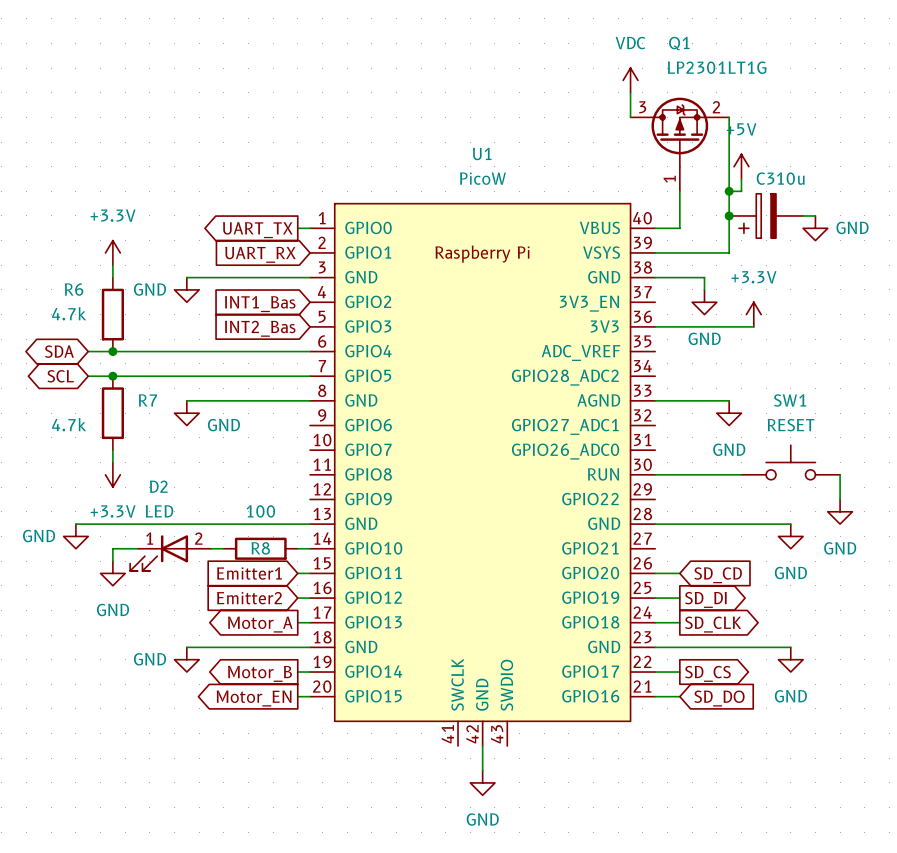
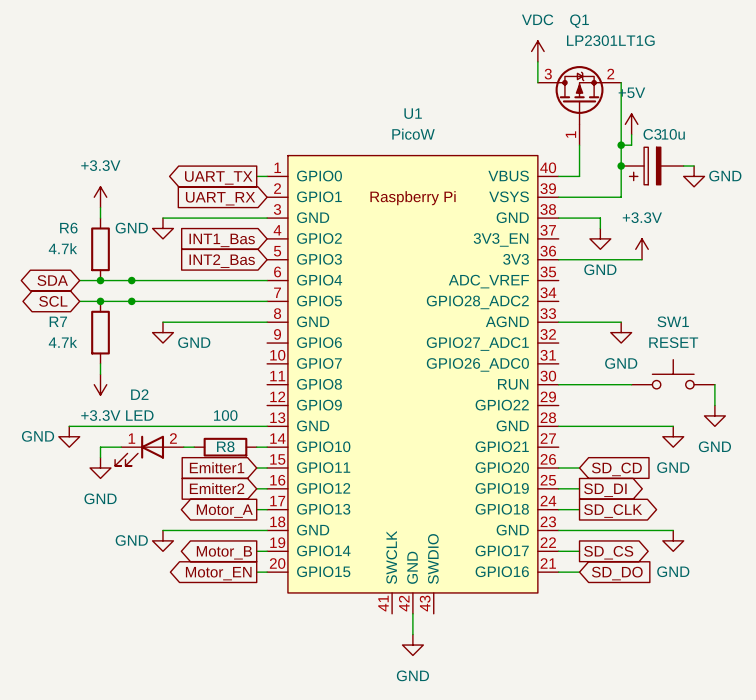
junction: none -> (131, 280)
junction: none -> (131, 301)
R7 name position: R7 (147, 400) -> R7 (58, 321)

